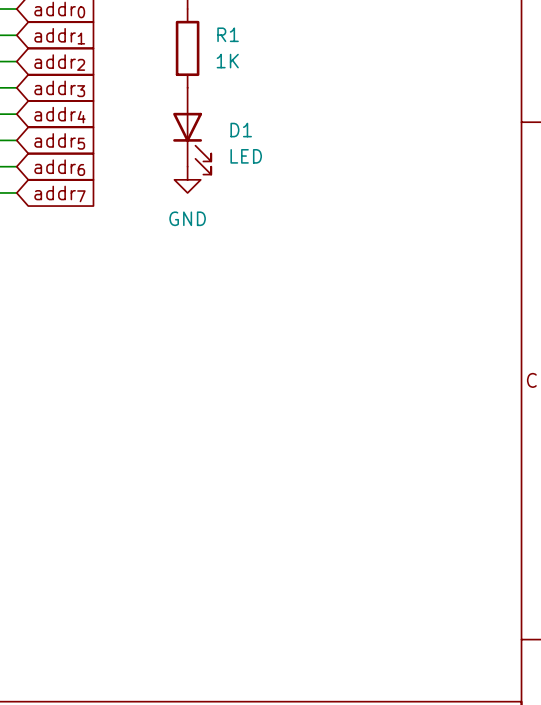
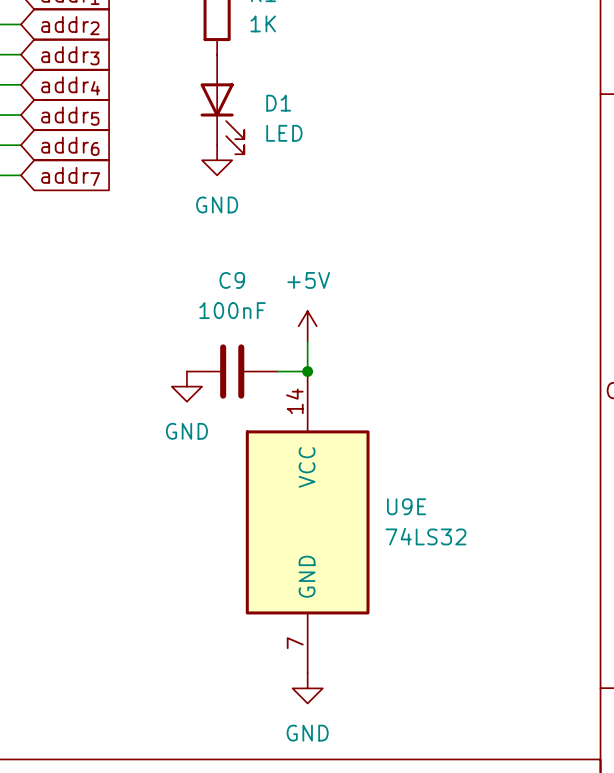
power symbol: none -> +5V (307, 326)
wire: none -> (307, 341) (307, 371) (277, 371)
C9: none -> 100nF (232, 371)
junction: none -> (307, 371)
power symbol: none -> GND (186, 386)
U9E: none -> 74LS32 (307, 522)
power symbol: none -> GND (307, 688)

